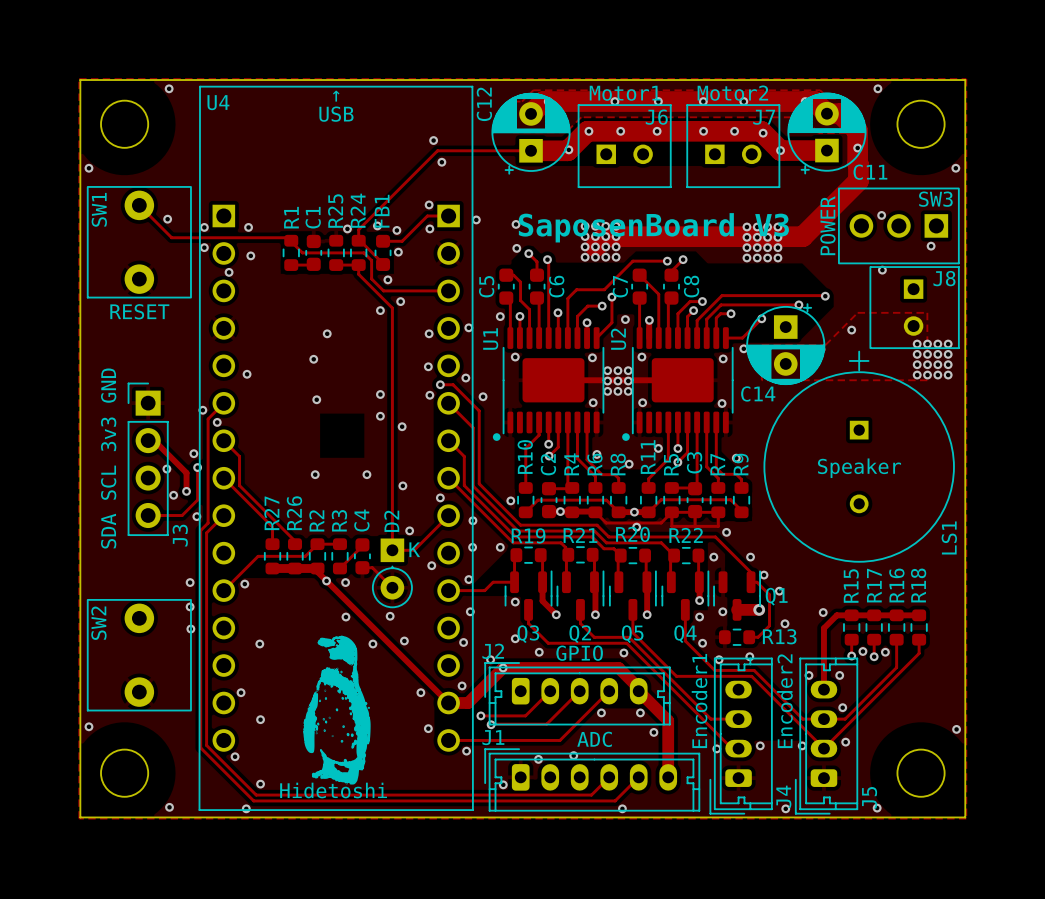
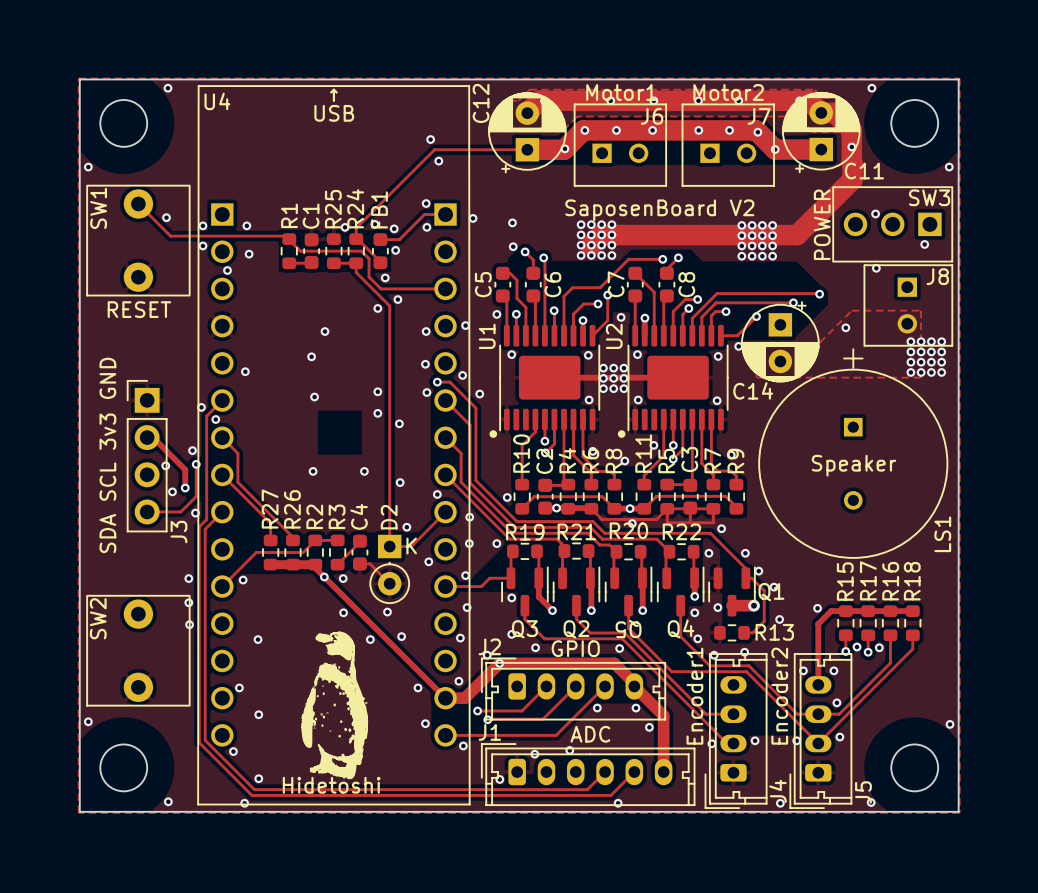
text: SaposenBoard V3 (653, 227) -> SaposenBoard V2 (659, 210)
Q5 name rotation: 0° (632, 634) -> 180° (628, 629)

